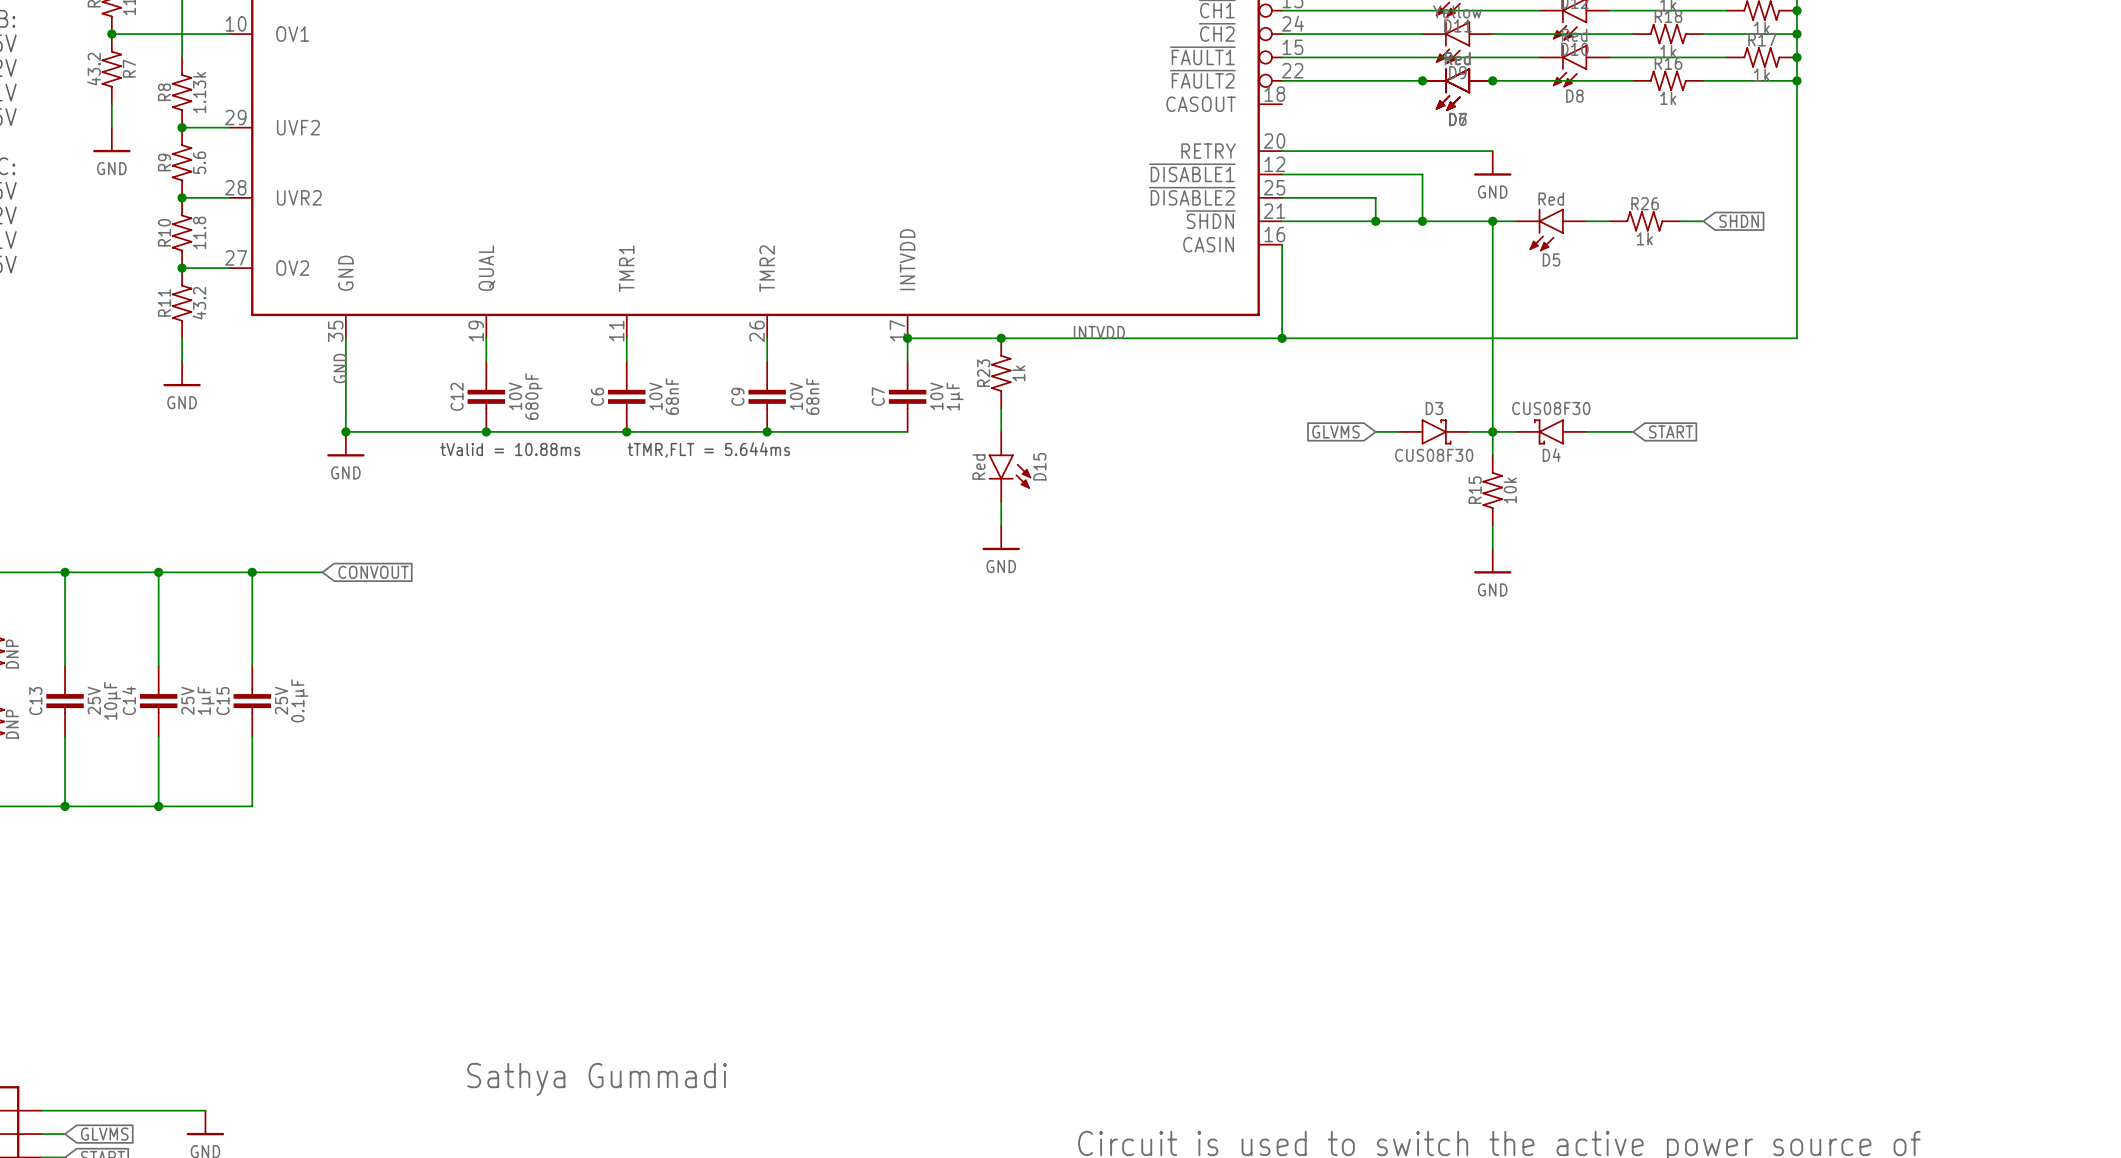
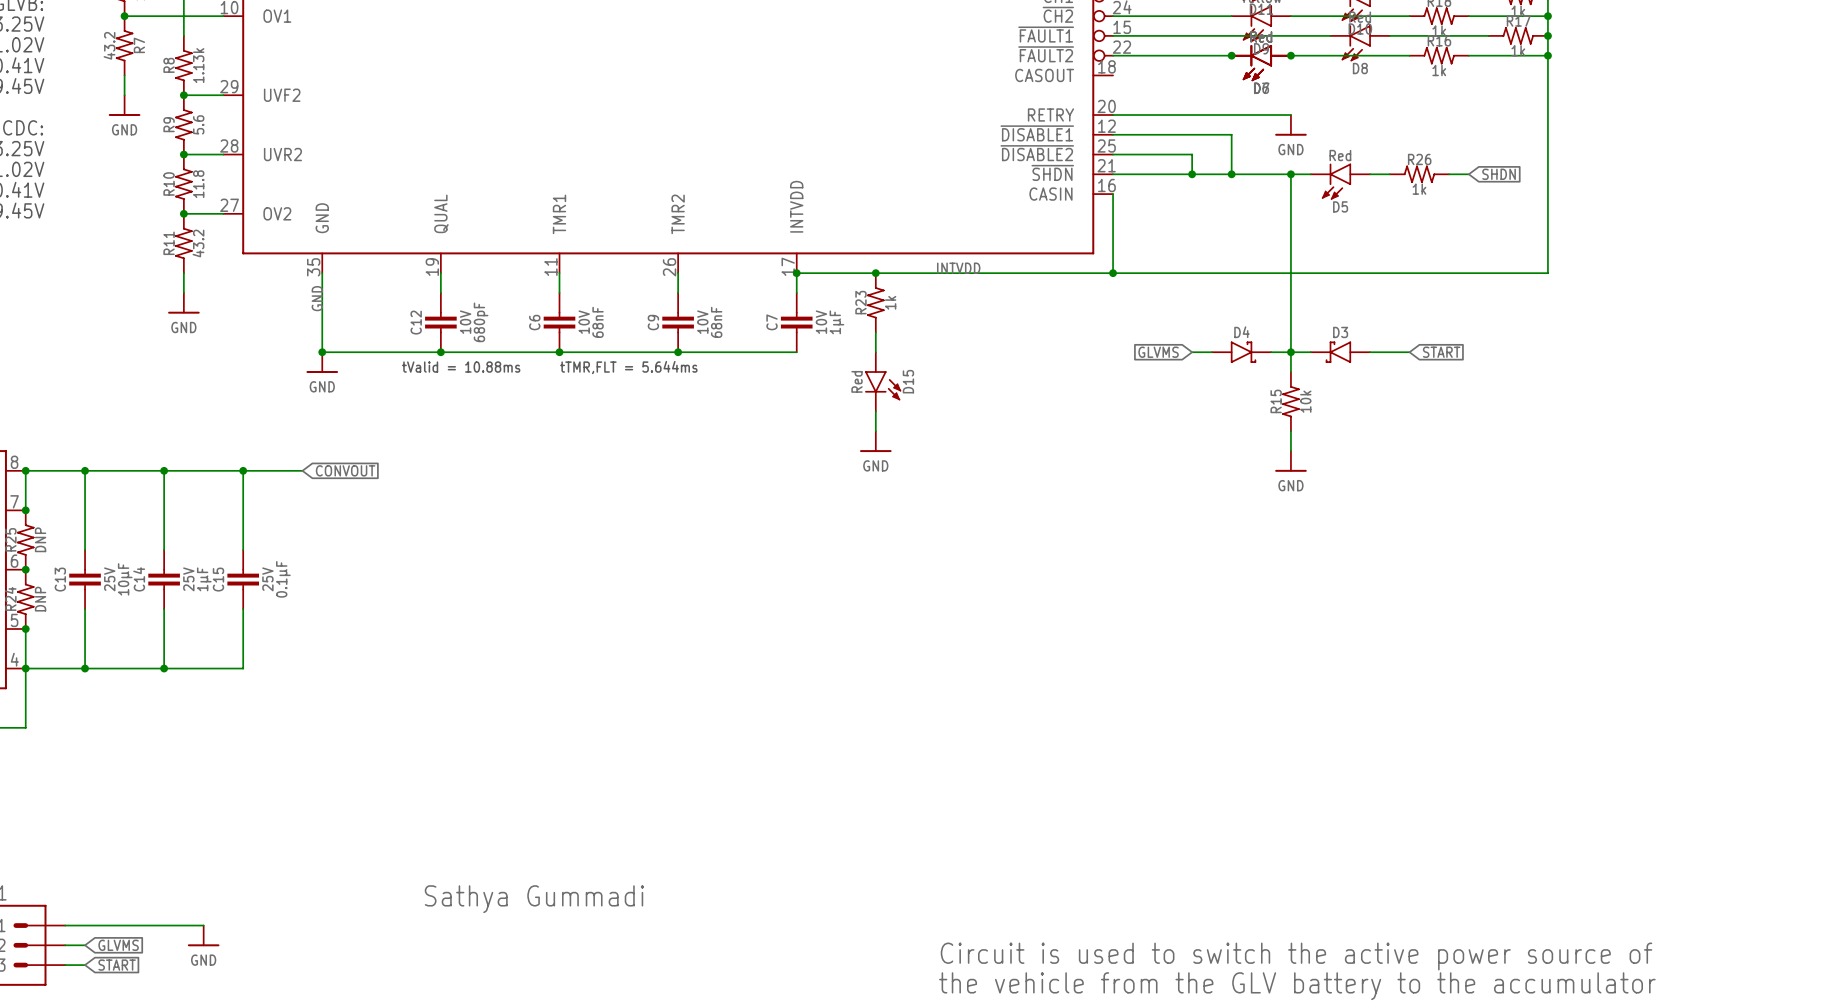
D3 name: D3 (1434, 408) -> D4 (1241, 332)
D4: (1551, 431) -> none
D3: none -> (1340, 352)
D3 text: CUS08F30 (1434, 455) -> none

